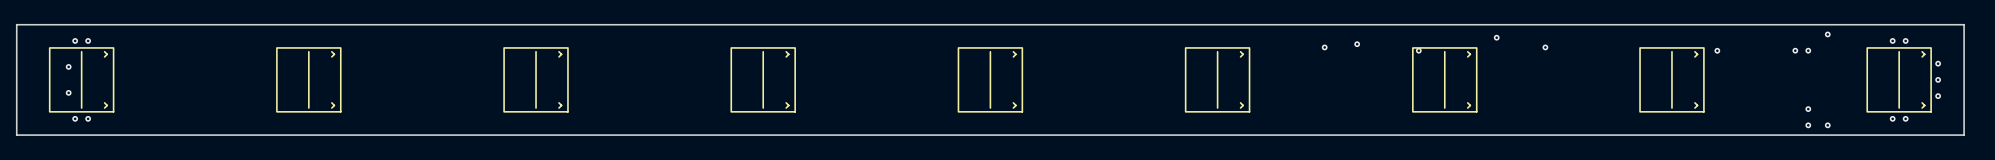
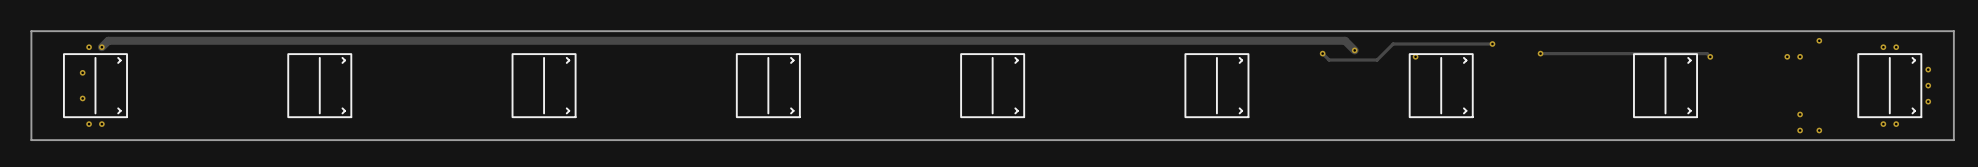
track: none -> (1492, 43) (1393, 43) (1377, 60) (1329, 60) (1322, 53)
track: none -> (101, 47) (108, 40) (1345, 40) (1354, 50)
track: none -> (1540, 53) (1707, 53) (1710, 56)

